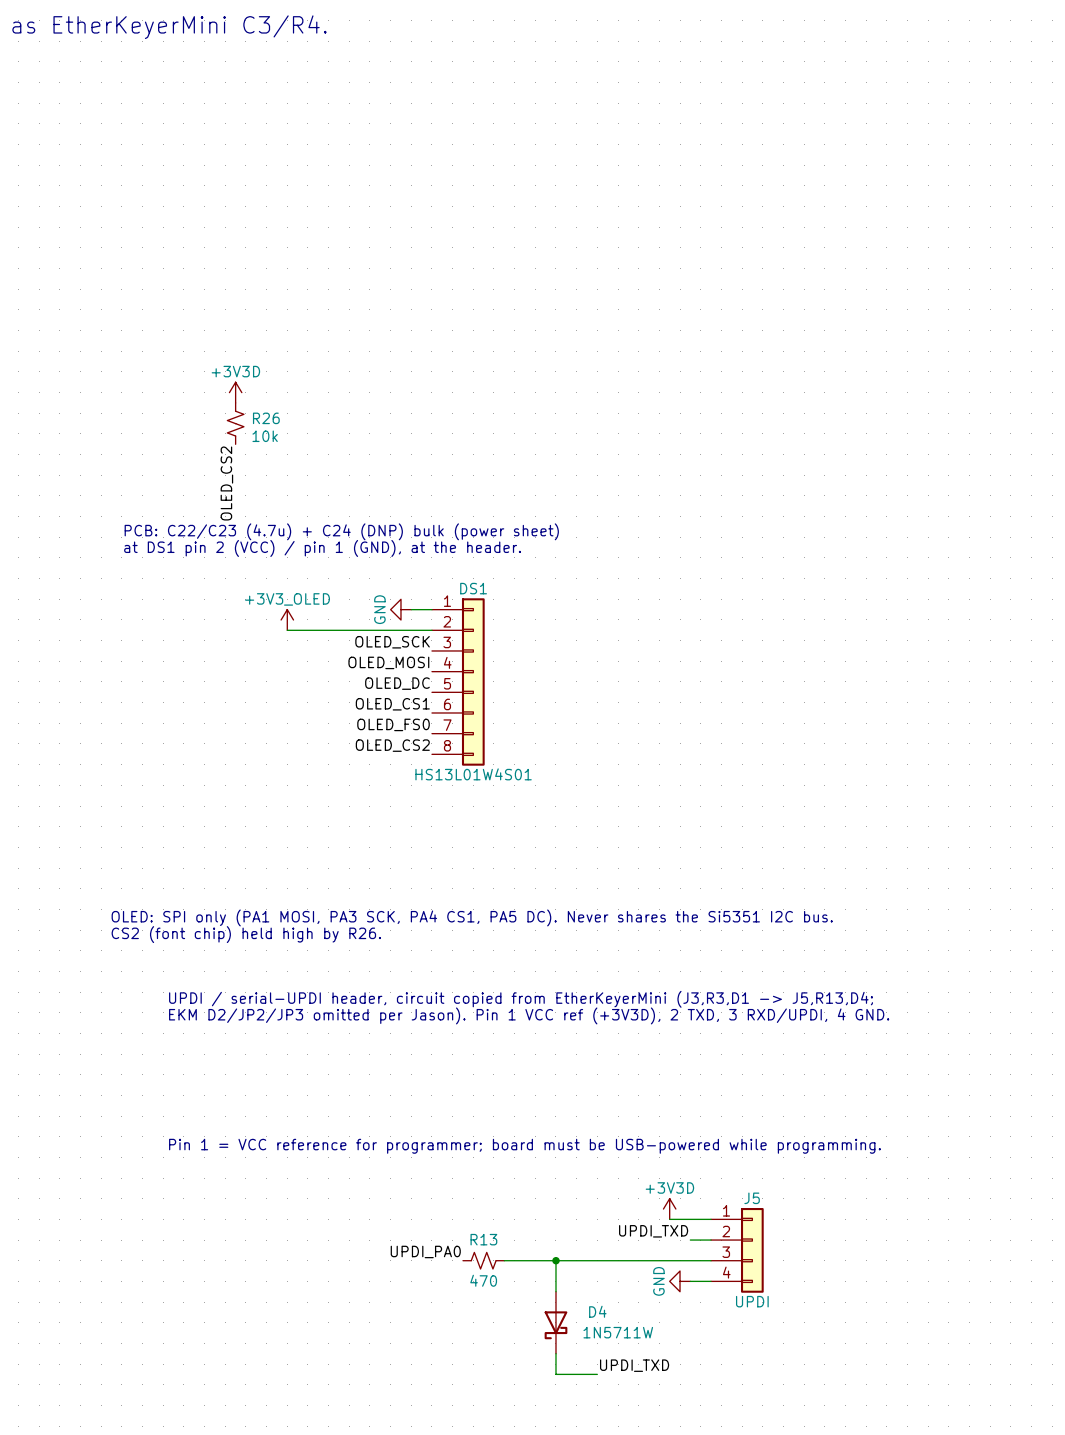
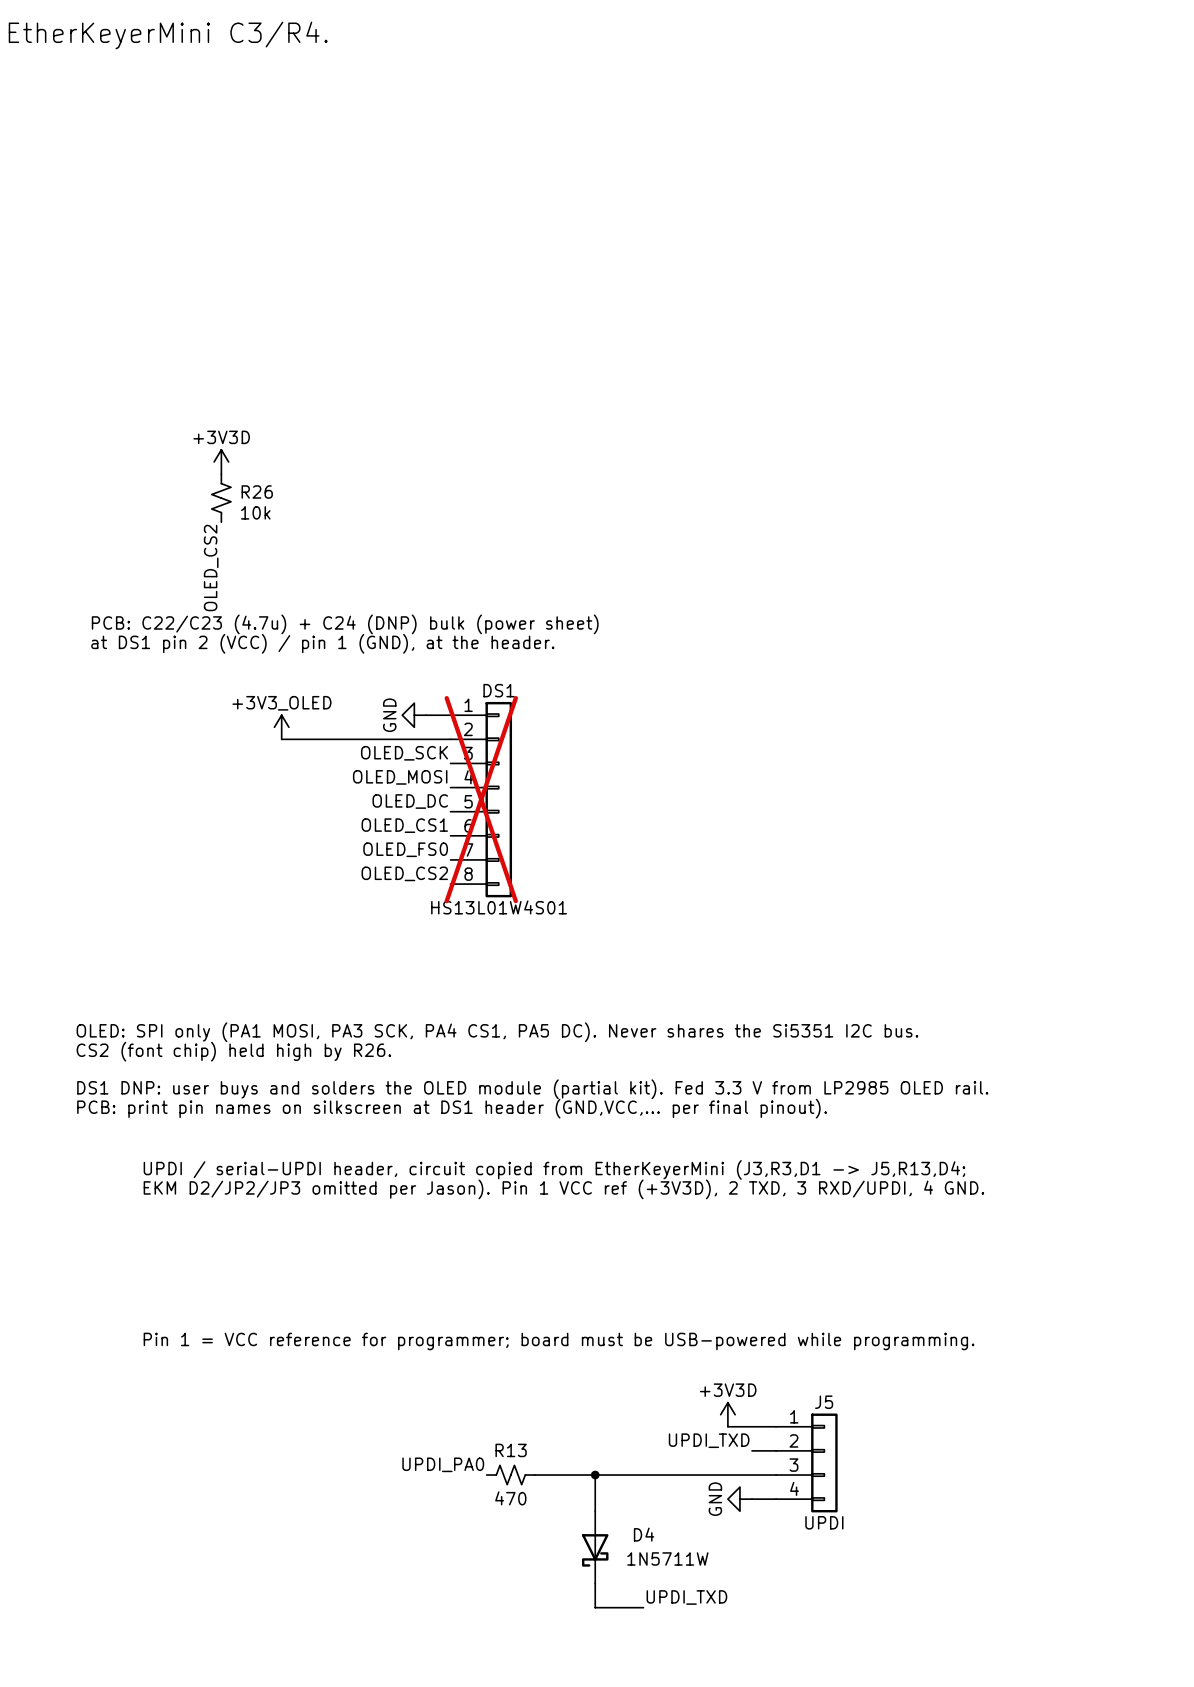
DS1 do-not-place cross: none -> (481, 799)
text position: OLED: SPI only (PA1 MOSI, PA3 SCK, PA4 CS1, PA5 DC). Never shares the Si5351 I2C bus. (472, 917) -> OLED: SPI only (PA1 MOSI, PA3 SCK, PA4 CS1, PA5 DC). Never shares the Si5351 I2C bus. (497, 1032)
text: none -> DS1 DNP: user buys and solders the OLED module (partial kit). Fed 3.3 V from LP2985 OLED rail. (532, 1089)
text position: CS2 (font chip) held high by R26. (246, 934) -> CS2 (font chip) held high by R26. (233, 1051)
text: none -> PCB: print pin names on silkscreen at DS1 header (GND,VCC,... per final pinout). (452, 1108)

